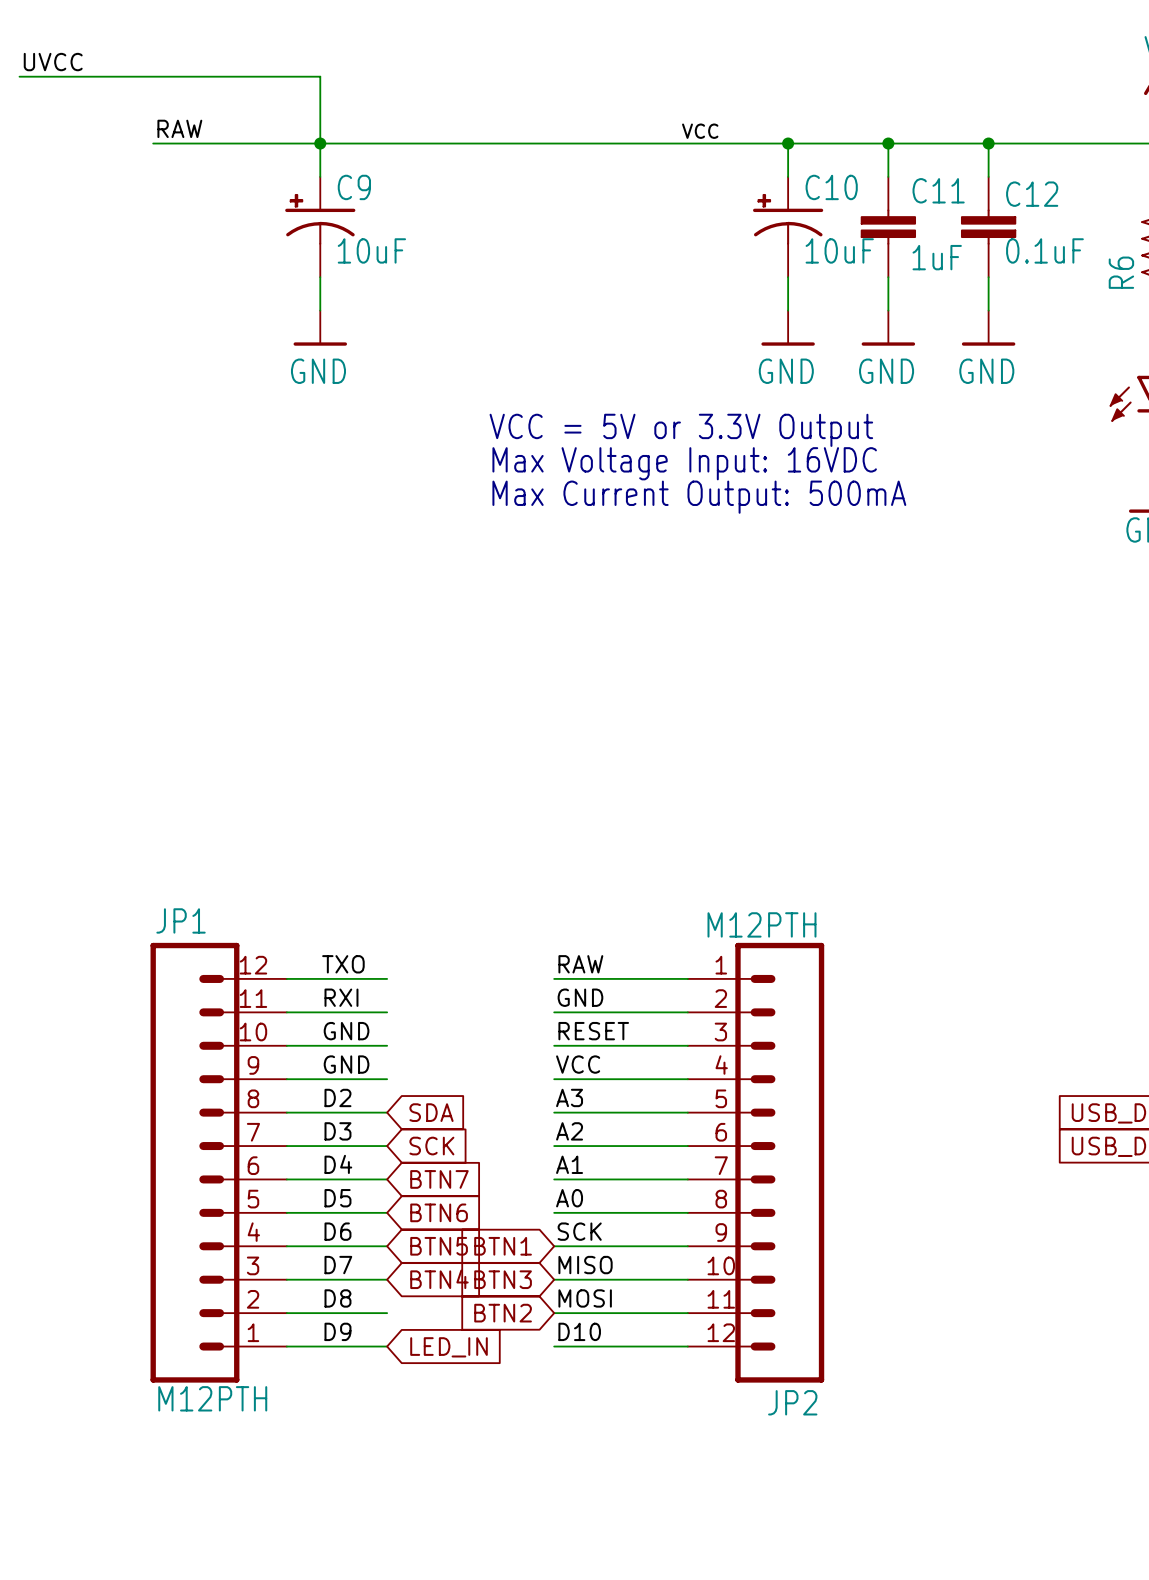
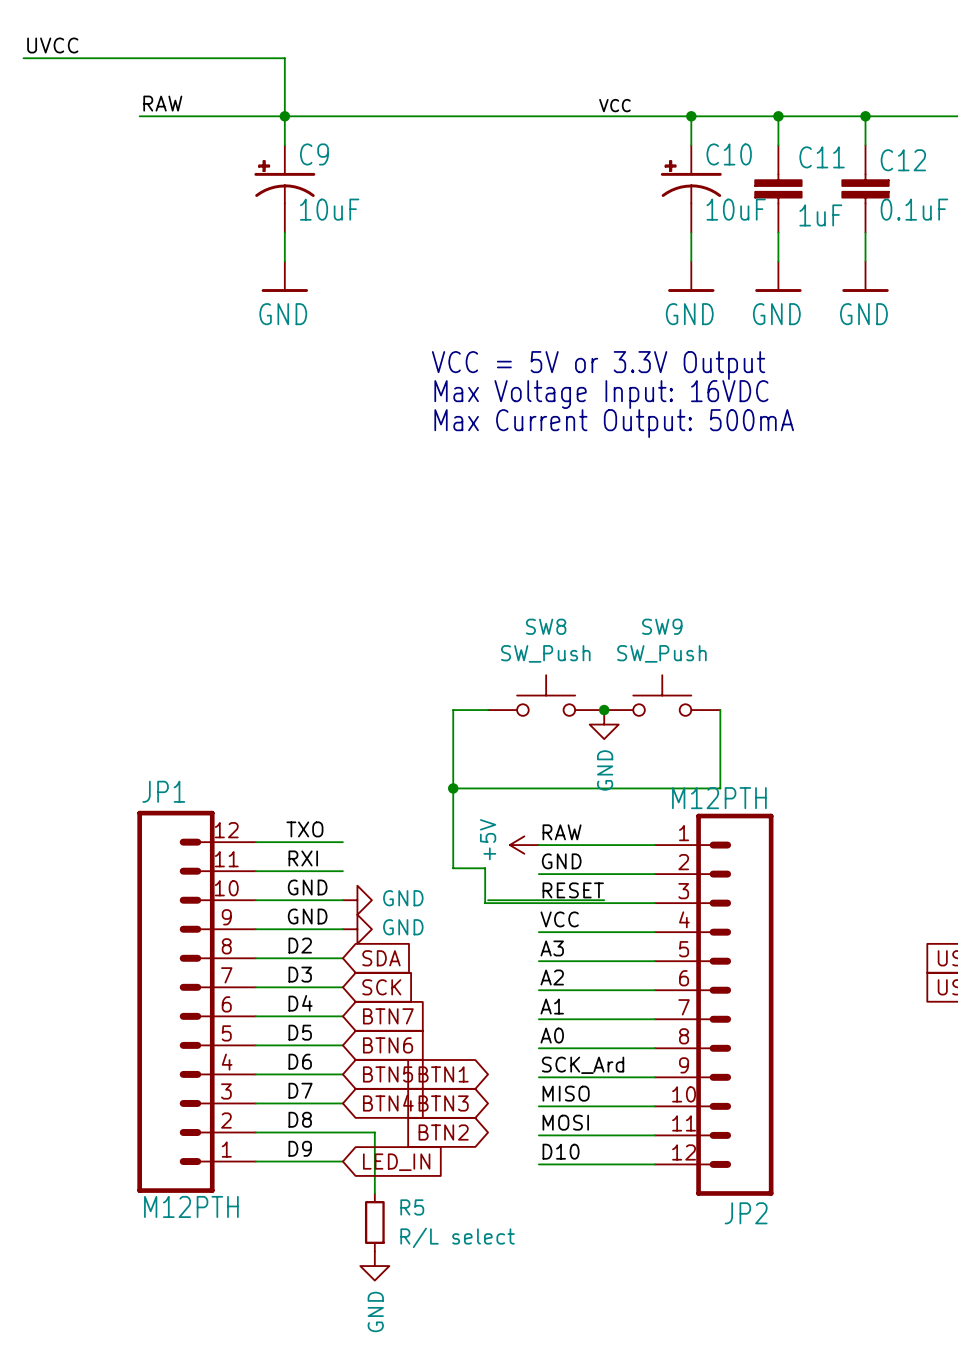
SW8: none -> SW_Push (546, 695)
SW9: none -> SW_Push (662, 695)
wire: none -> (488, 710) (453, 710) (453, 868) (485, 868) (485, 903) (655, 903)
junction: none -> (604, 710)
wire: none -> (720, 710) (720, 788) (453, 788)
power symbol: none -> GND (604, 724)
junction: none -> (453, 788)
label position: RAW (580, 964) -> RAW (562, 832)
wire: (554, 978) (687, 978) -> (538, 845) (655, 845)
power symbol: none -> +5V (524, 845)
label position: GND (580, 997) -> GND (561, 861)
wire: (554, 1012) (687, 1012) -> (538, 874) (655, 874)
label position: RESET (593, 1031) -> RESET (573, 890)
power symbol: none -> GND (357, 900)
label position: VCC (578, 1064) -> VCC (559, 919)
power symbol: none -> GND (357, 929)
wire: (554, 1079) (687, 1079) -> (538, 932) (655, 932)
label position: A3 (569, 1097) -> A3 (552, 948)
wire: (554, 1112) (687, 1112) -> (538, 961) (655, 961)
label position: A2 (569, 1131) -> A2 (552, 977)
wire: (554, 1146) (687, 1146) -> (538, 990) (655, 990)
JP2 position: (756, 1162) -> (714, 1004)
label position: A1 (569, 1164) -> A1 (552, 1006)
wire: (554, 1179) (687, 1179) -> (538, 1019) (655, 1019)
label position: A0 (569, 1198) -> A0 (552, 1035)
wire: (554, 1212) (687, 1212) -> (538, 1048) (655, 1048)
label: SCK (579, 1231) -> none
label: none -> SCK_Ard (583, 1065)
wire: (554, 1246) (687, 1246) -> (538, 1077) (655, 1077)
label position: MISO (585, 1265) -> MISO (566, 1093)
wire: (554, 1279) (687, 1279) -> (538, 1106) (655, 1106)
label position: MOSI (585, 1298) -> MOSI (565, 1122)
wire: none -> (342, 1132) (374, 1132) (374, 1193)
wire: (554, 1313) (687, 1313) -> (538, 1135) (655, 1135)
label position: D10 (579, 1331) -> D10 (561, 1151)
wire: (554, 1346) (687, 1346) -> (538, 1164) (655, 1164)
R5: none -> R/L select (374, 1222)
power symbol: none -> GND (374, 1266)

